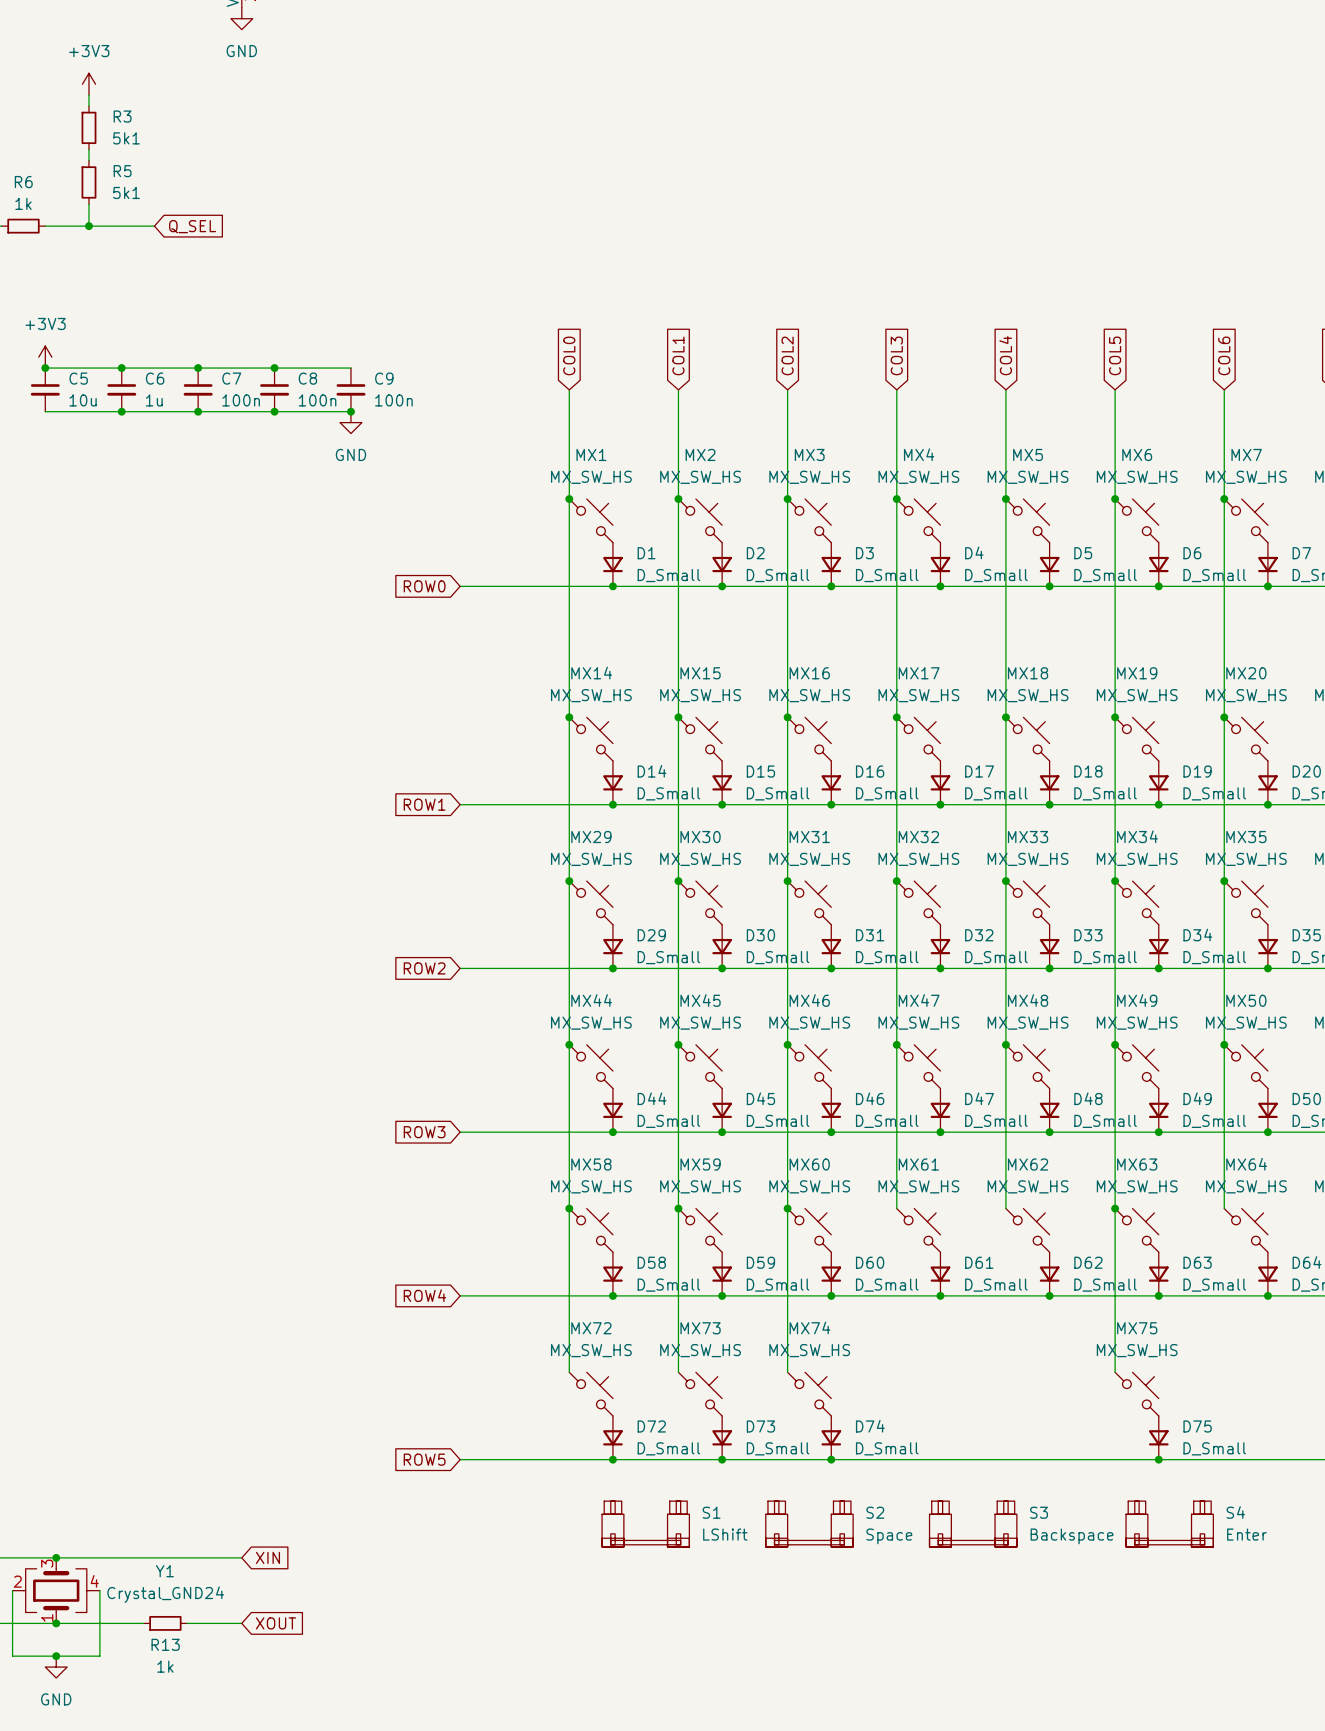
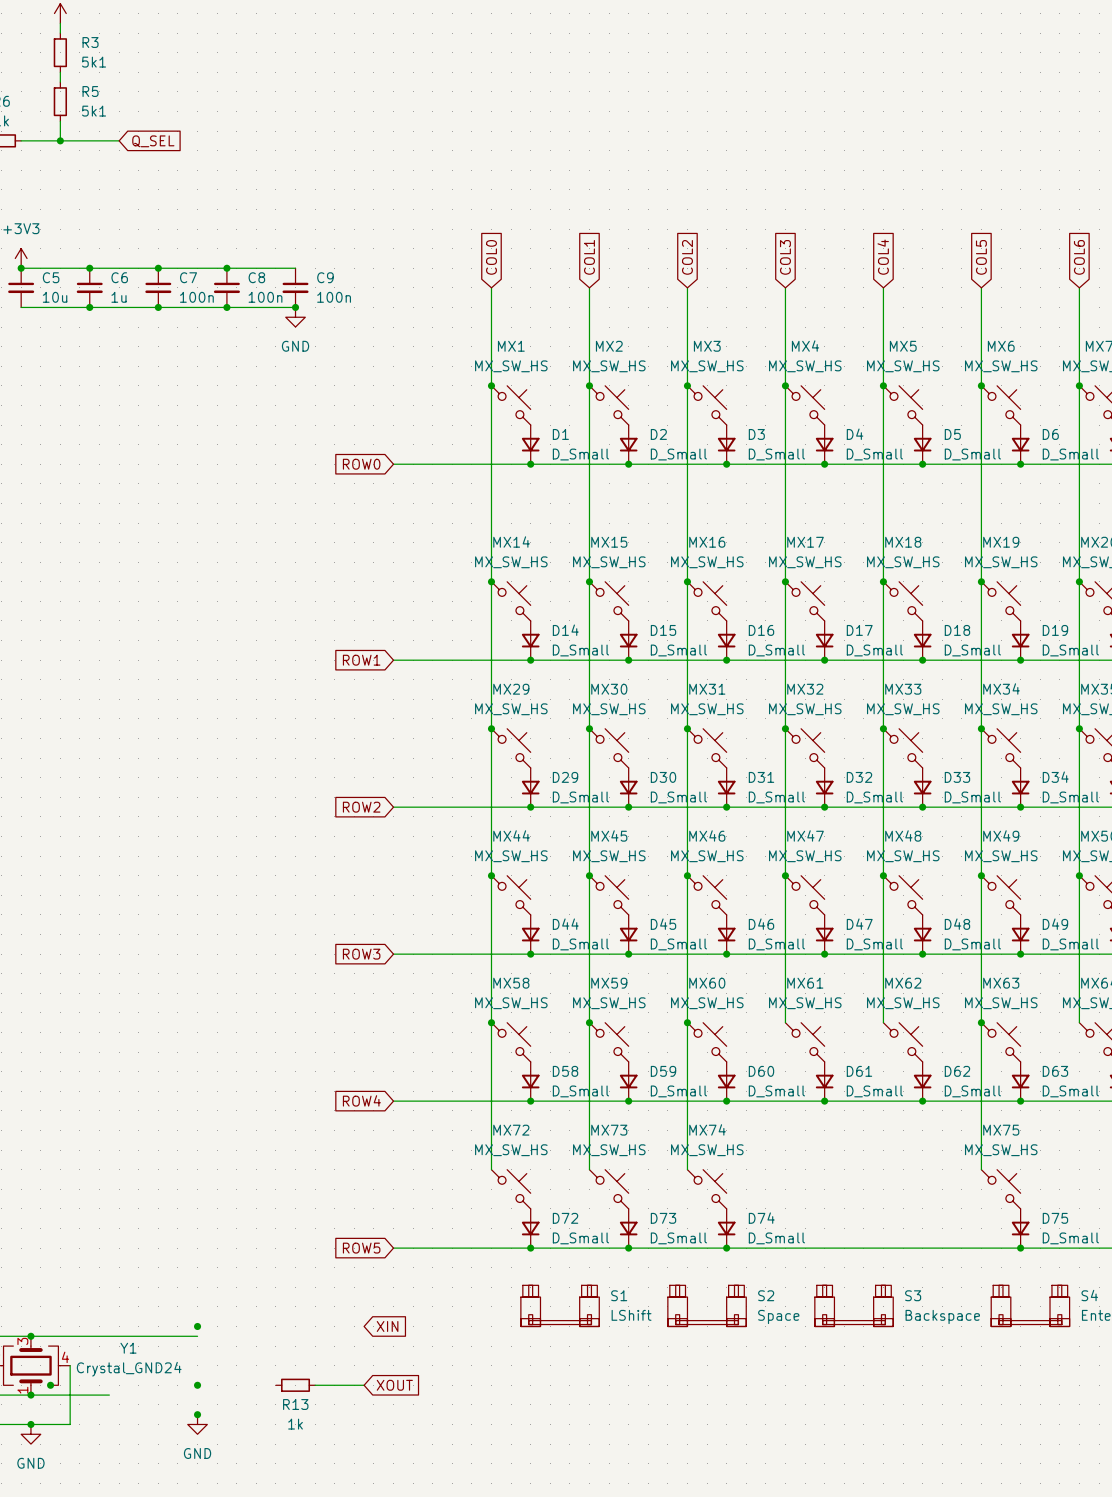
junction: none -> (197, 1326)
global label position: XIN (267, 1557) -> XIN (387, 1326)
junction: none -> (50, 1385)
junction: none -> (197, 1385)
R13 position: (165, 1623) -> (295, 1385)
wire: (187, 1623) (241, 1623) -> (315, 1385) (364, 1385)
global label position: XOUT (276, 1623) -> XOUT (394, 1385)
junction: none -> (197, 1414)
power symbol: none -> GND (197, 1424)

